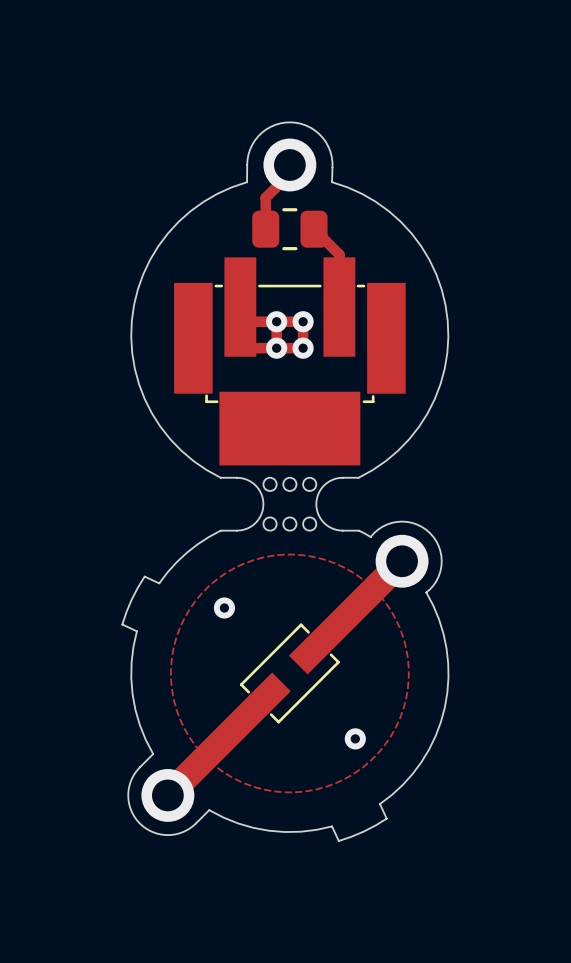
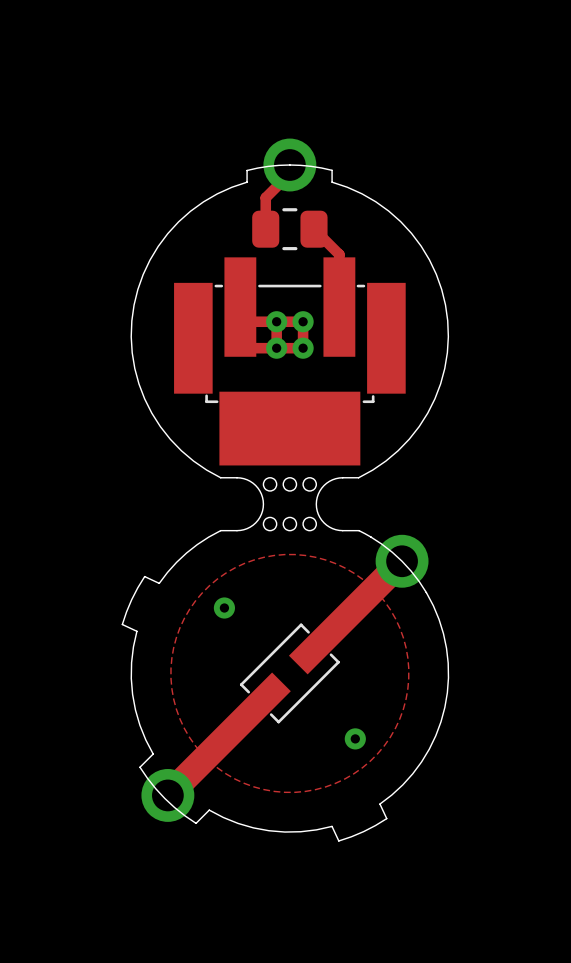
board edge: (247, 182) (248, 154) (255, 140) (270, 126) (291, 122) (311, 127) (326, 142) (331, 156) (332, 182) -> (247, 182) (247, 170) (289, 165) (332, 170) (332, 182)
board edge: (370, 536) (382, 526) (397, 521) (412, 522) (430, 533) (438, 546) (441, 566) (436, 580) (426, 592) -> (370, 536) (402, 561) (426, 592)
board edge: (139, 767) (130, 783) (128, 797) (131, 811) (139, 823) (151, 831) (165, 835) (179, 833) (196, 823) -> (139, 767) (164, 798) (196, 823)

